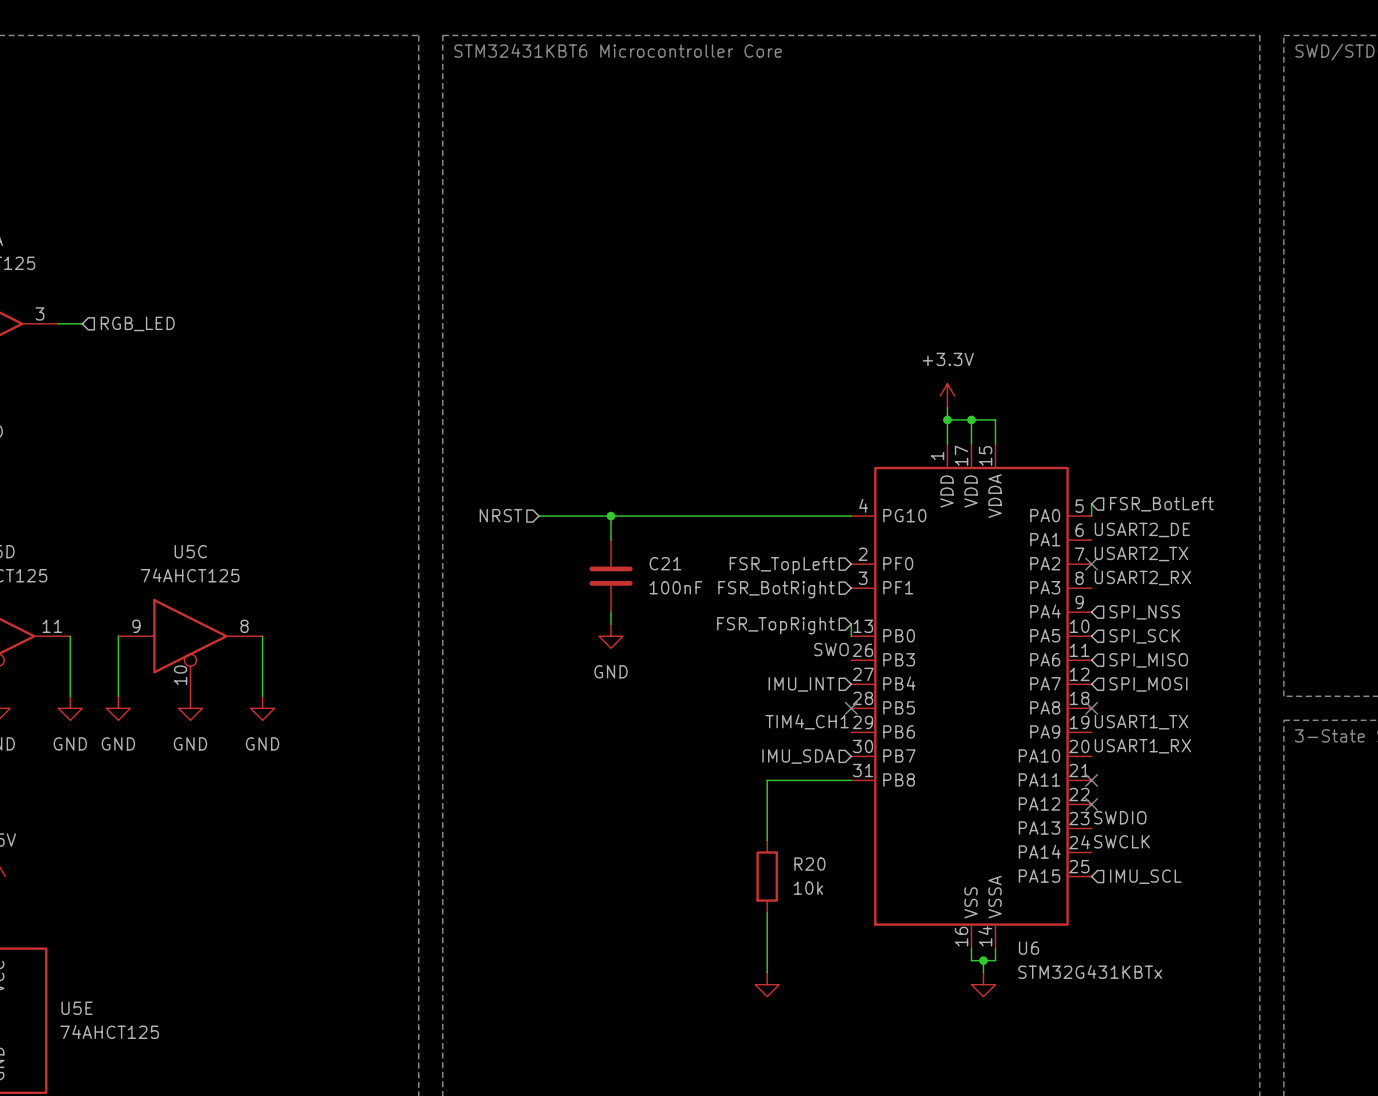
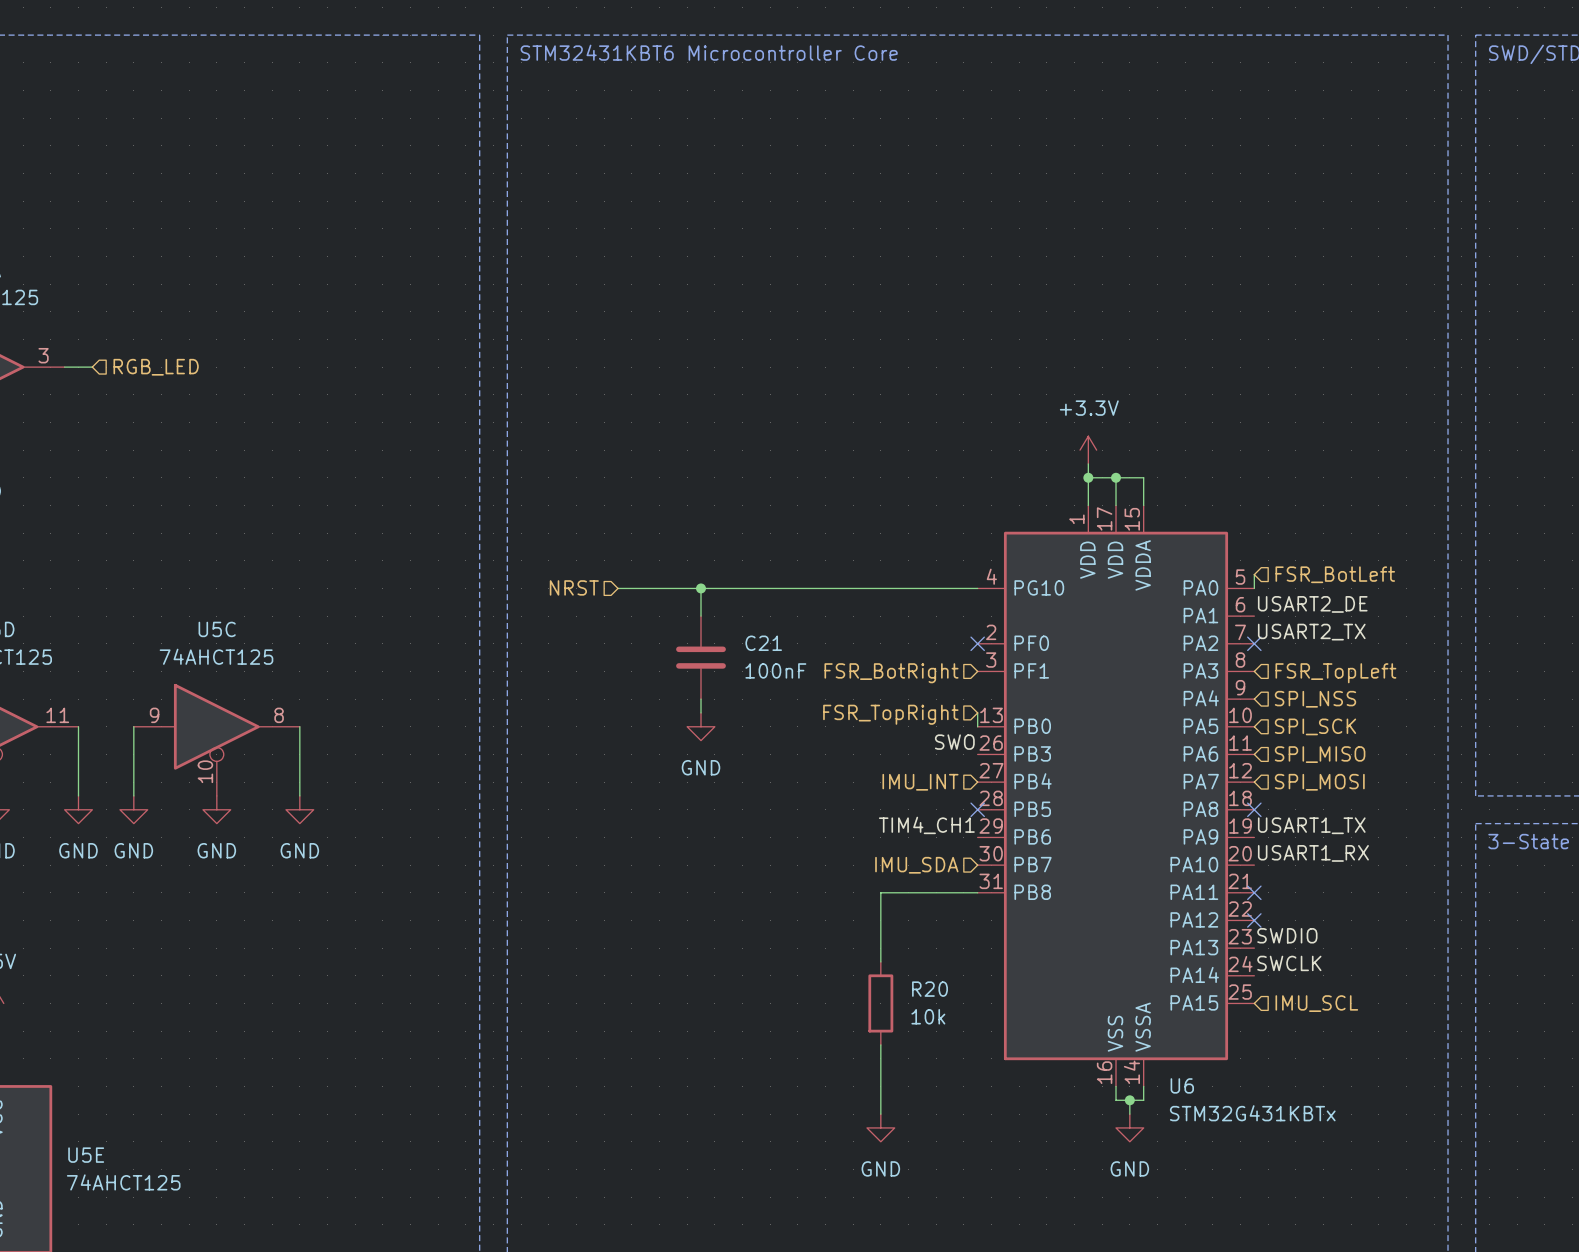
no-connect mark: none -> (977, 643)
hierarchical label: FSR_TopLeft (782, 565) -> none
label: USART2_RX (1142, 578) -> none
hierarchical label: none -> FSR_TopLeft (1335, 673)
power symbol text: none -> GND (880, 1168)
power symbol text: none -> GND (1129, 1168)

